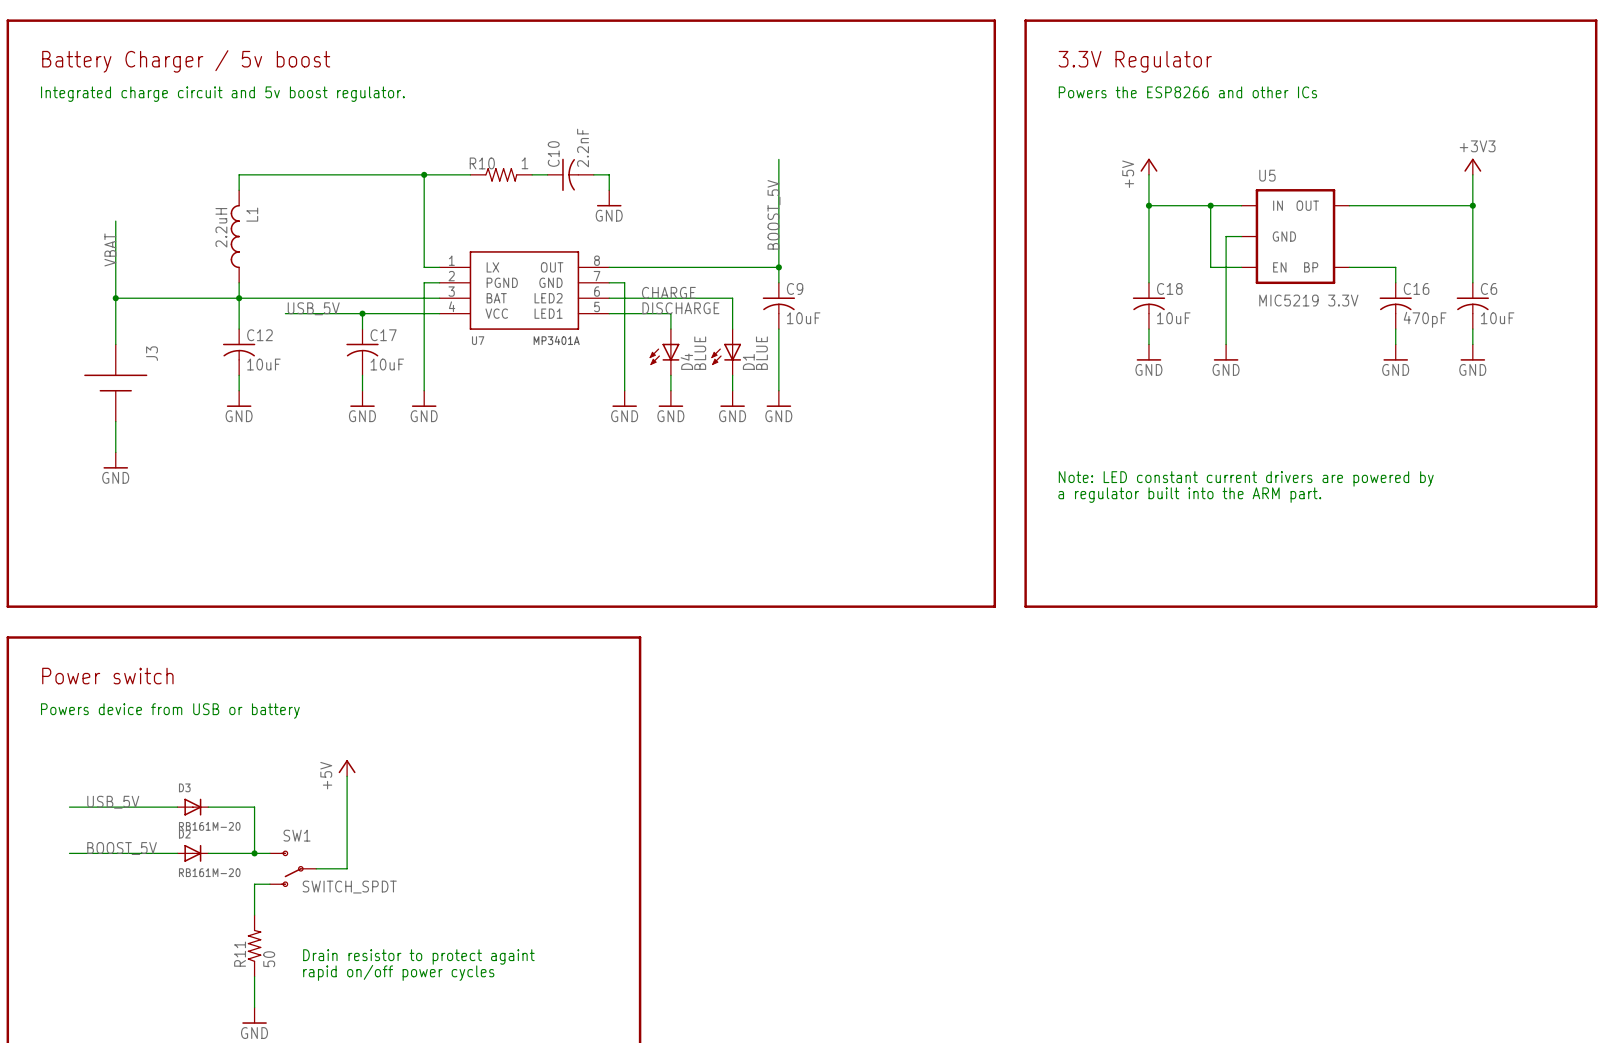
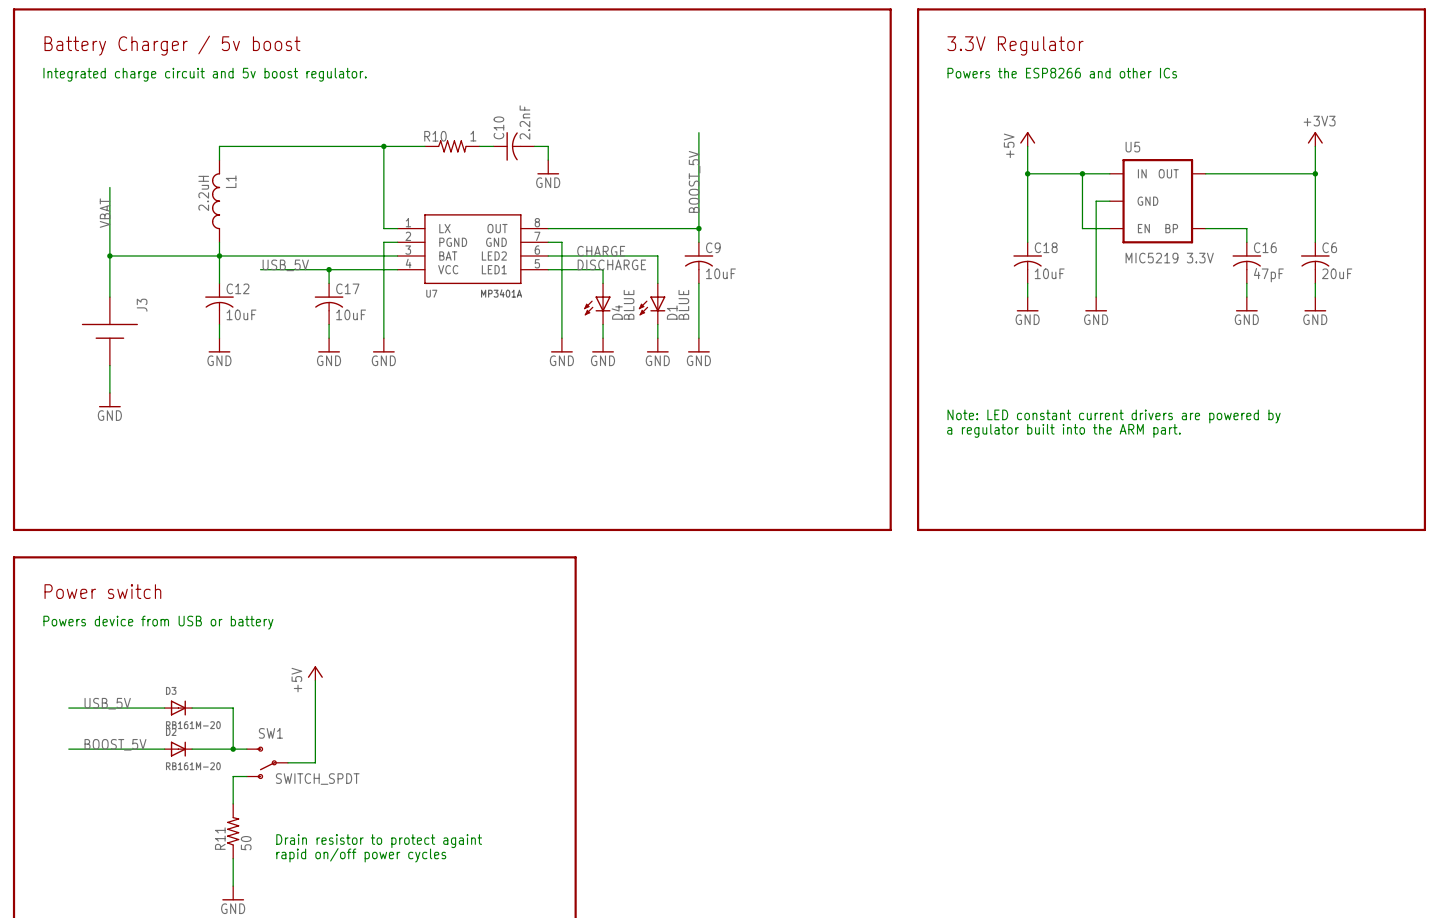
C6 value: 10uF (1497, 318) -> 20uF (1337, 273)
C16 value: 470pF (1425, 319) -> 47pF (1268, 275)

